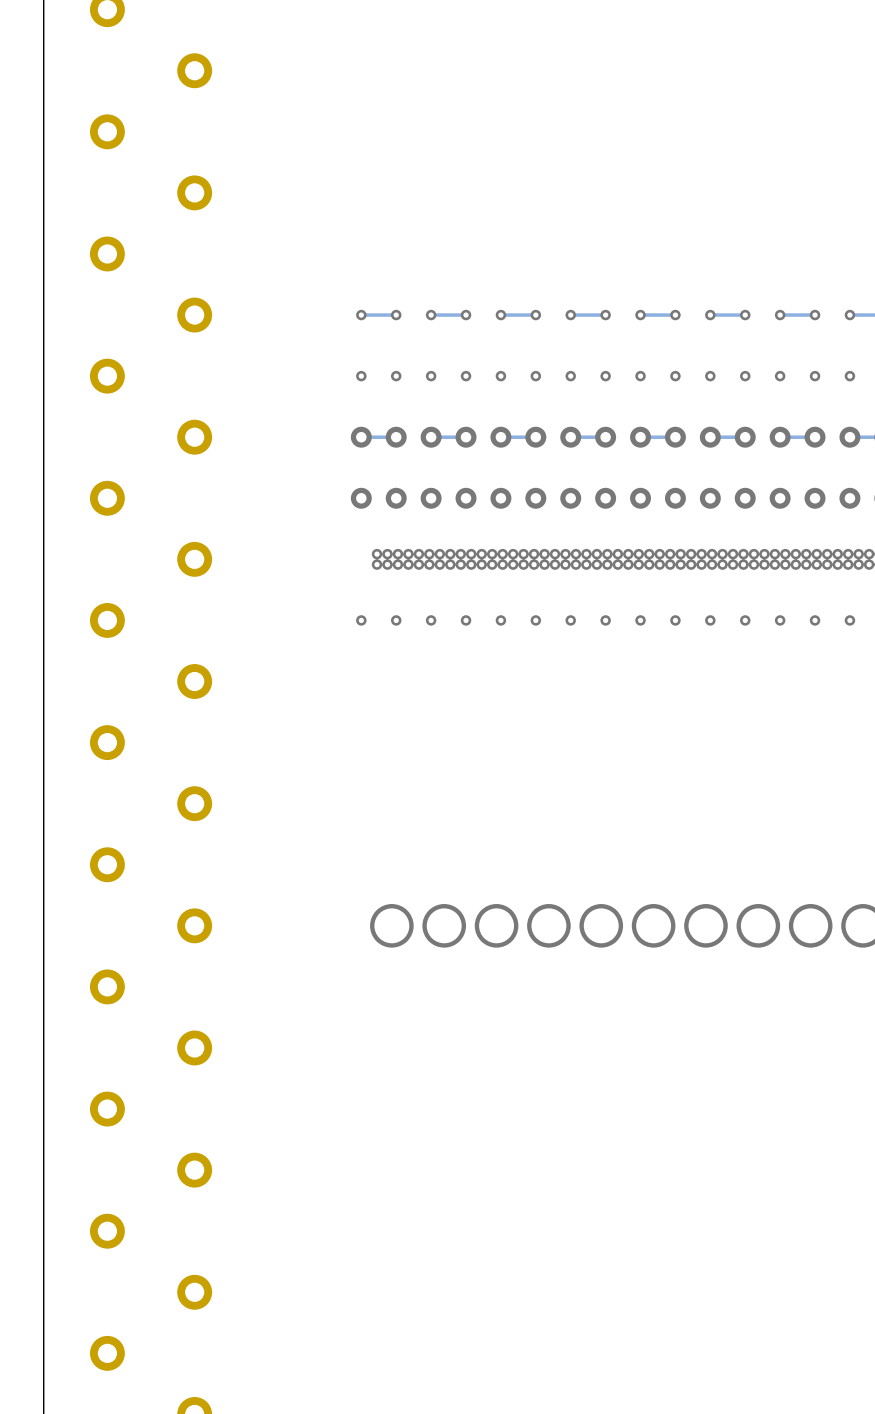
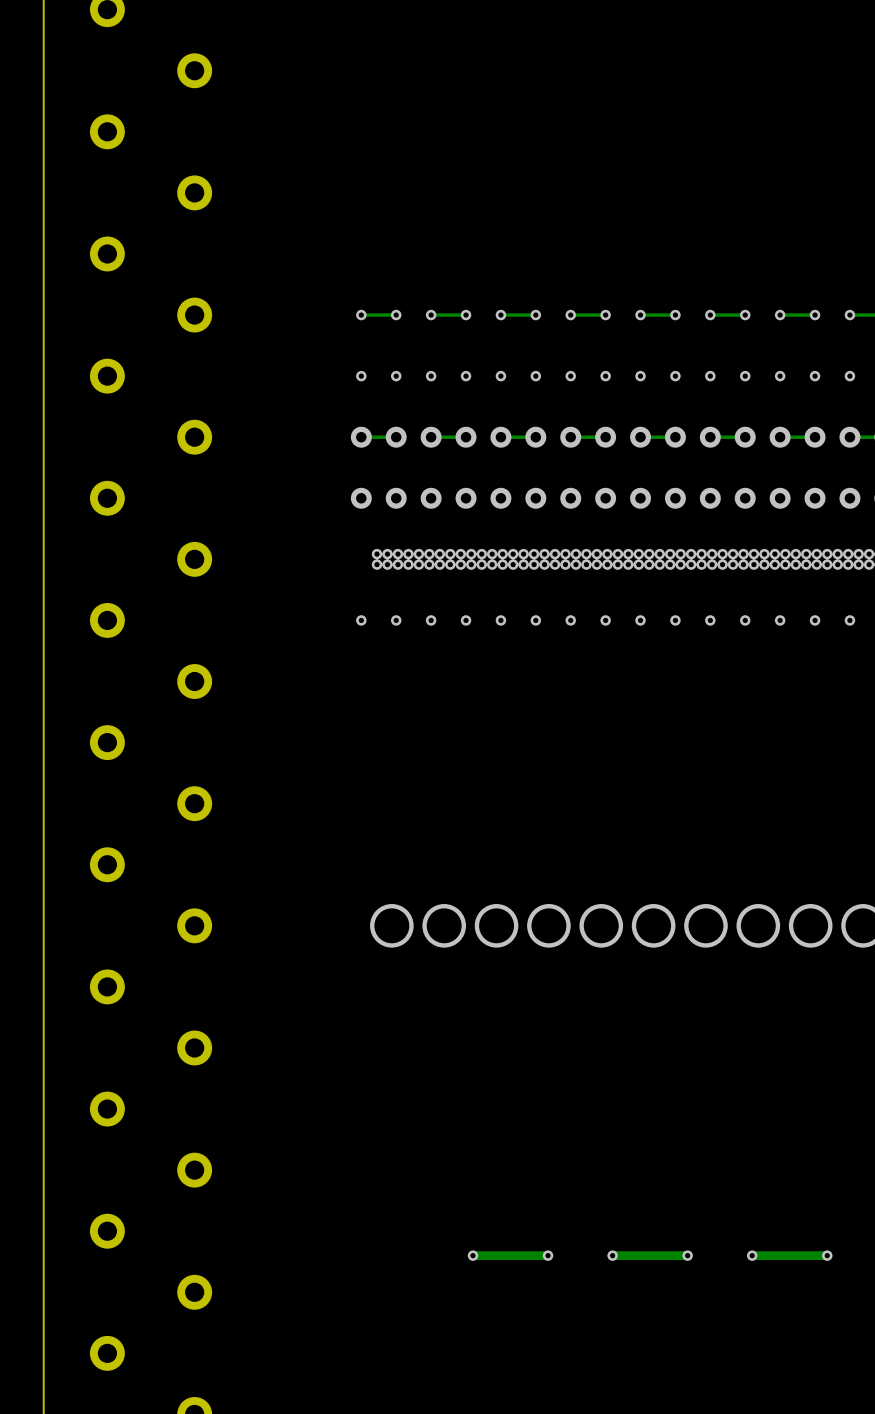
via: none -> (473, 1255)
track: none -> (548, 1255) (473, 1255)
via: none -> (548, 1255)
via: none -> (612, 1255)
track: none -> (687, 1255) (612, 1255)
via: none -> (687, 1255)
via: none -> (752, 1255)
track: none -> (827, 1255) (752, 1255)
via: none -> (827, 1255)

